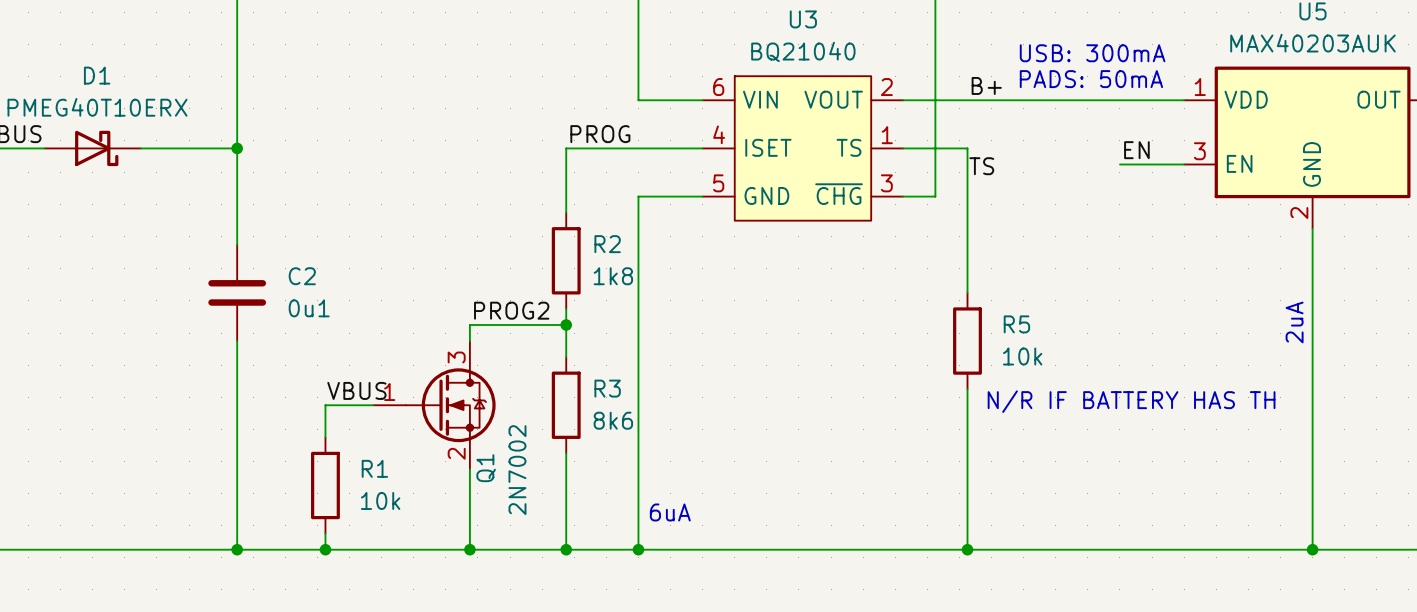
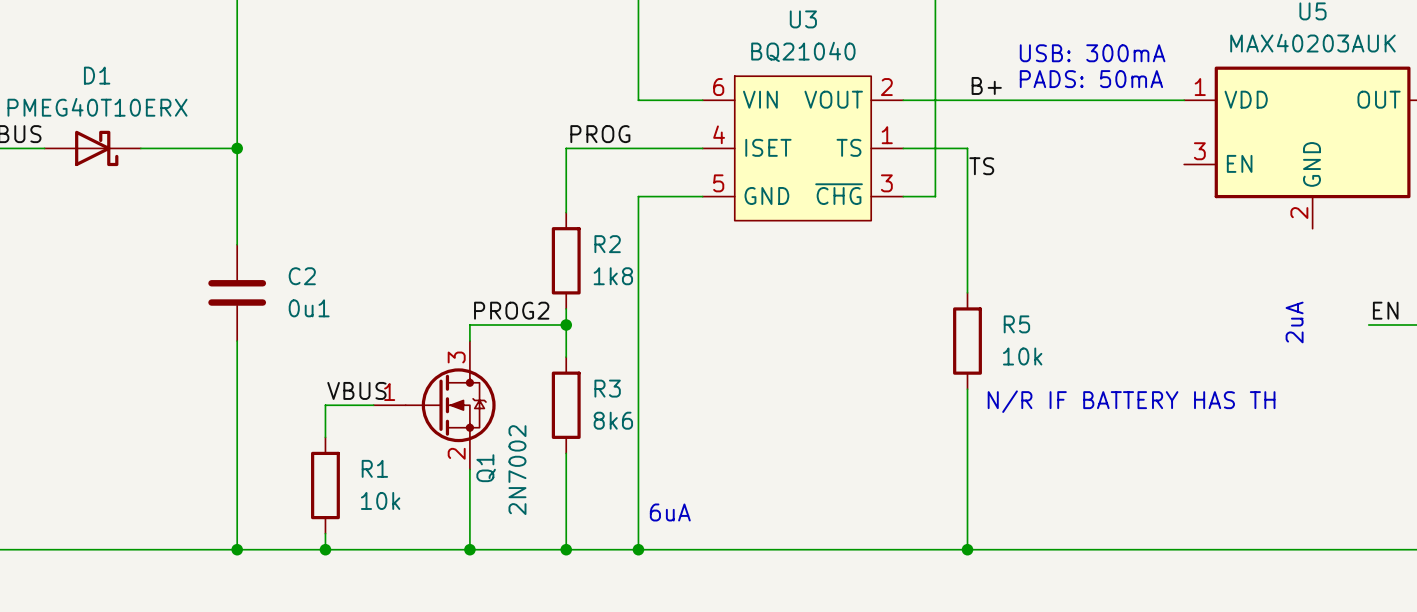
label position: EN (1136, 150) -> EN (1385, 310)
wire: (1119, 164) (1184, 164) -> none
wire: (1312, 228) (1312, 549) -> none
wire: none -> (1368, 325) (1416, 325)
junction: (1312, 549) -> none

